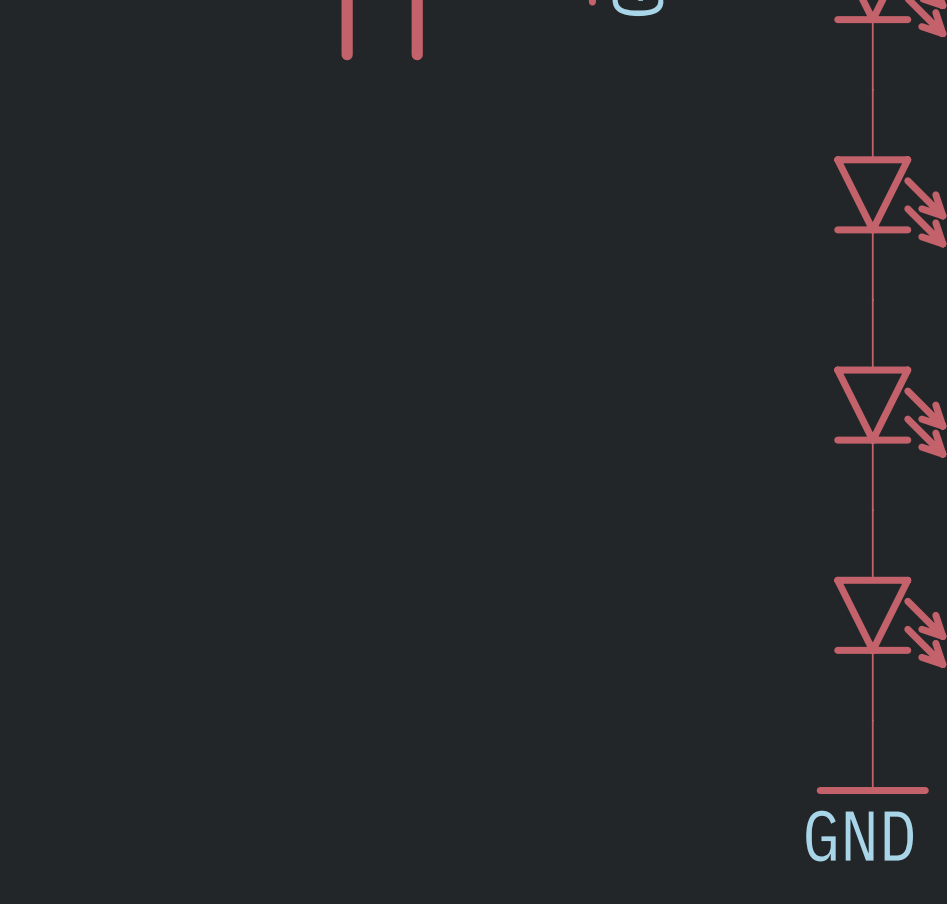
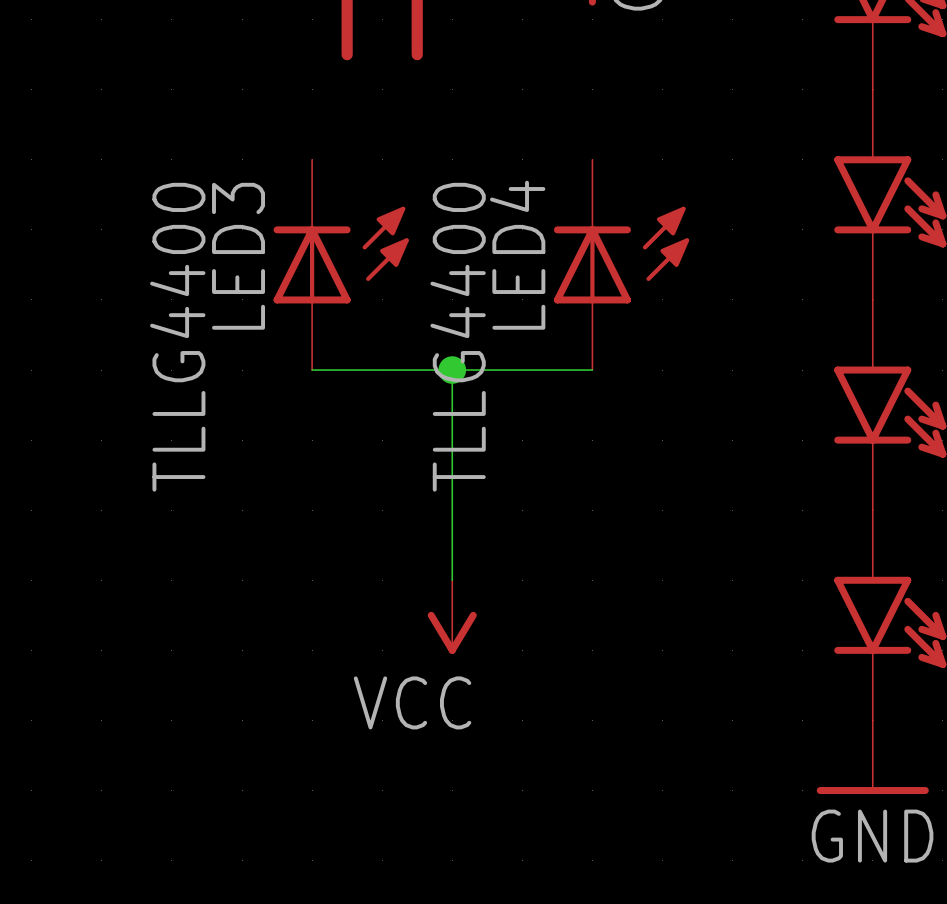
LED3: none -> TLLG4400 (341, 264)
LED4: none -> TLLG4400 (621, 264)
wire: none -> (312, 370) (592, 370)
wire: none -> (452, 370) (452, 580)
junction: none -> (452, 370)
power symbol: none -> VCC (452, 617)

